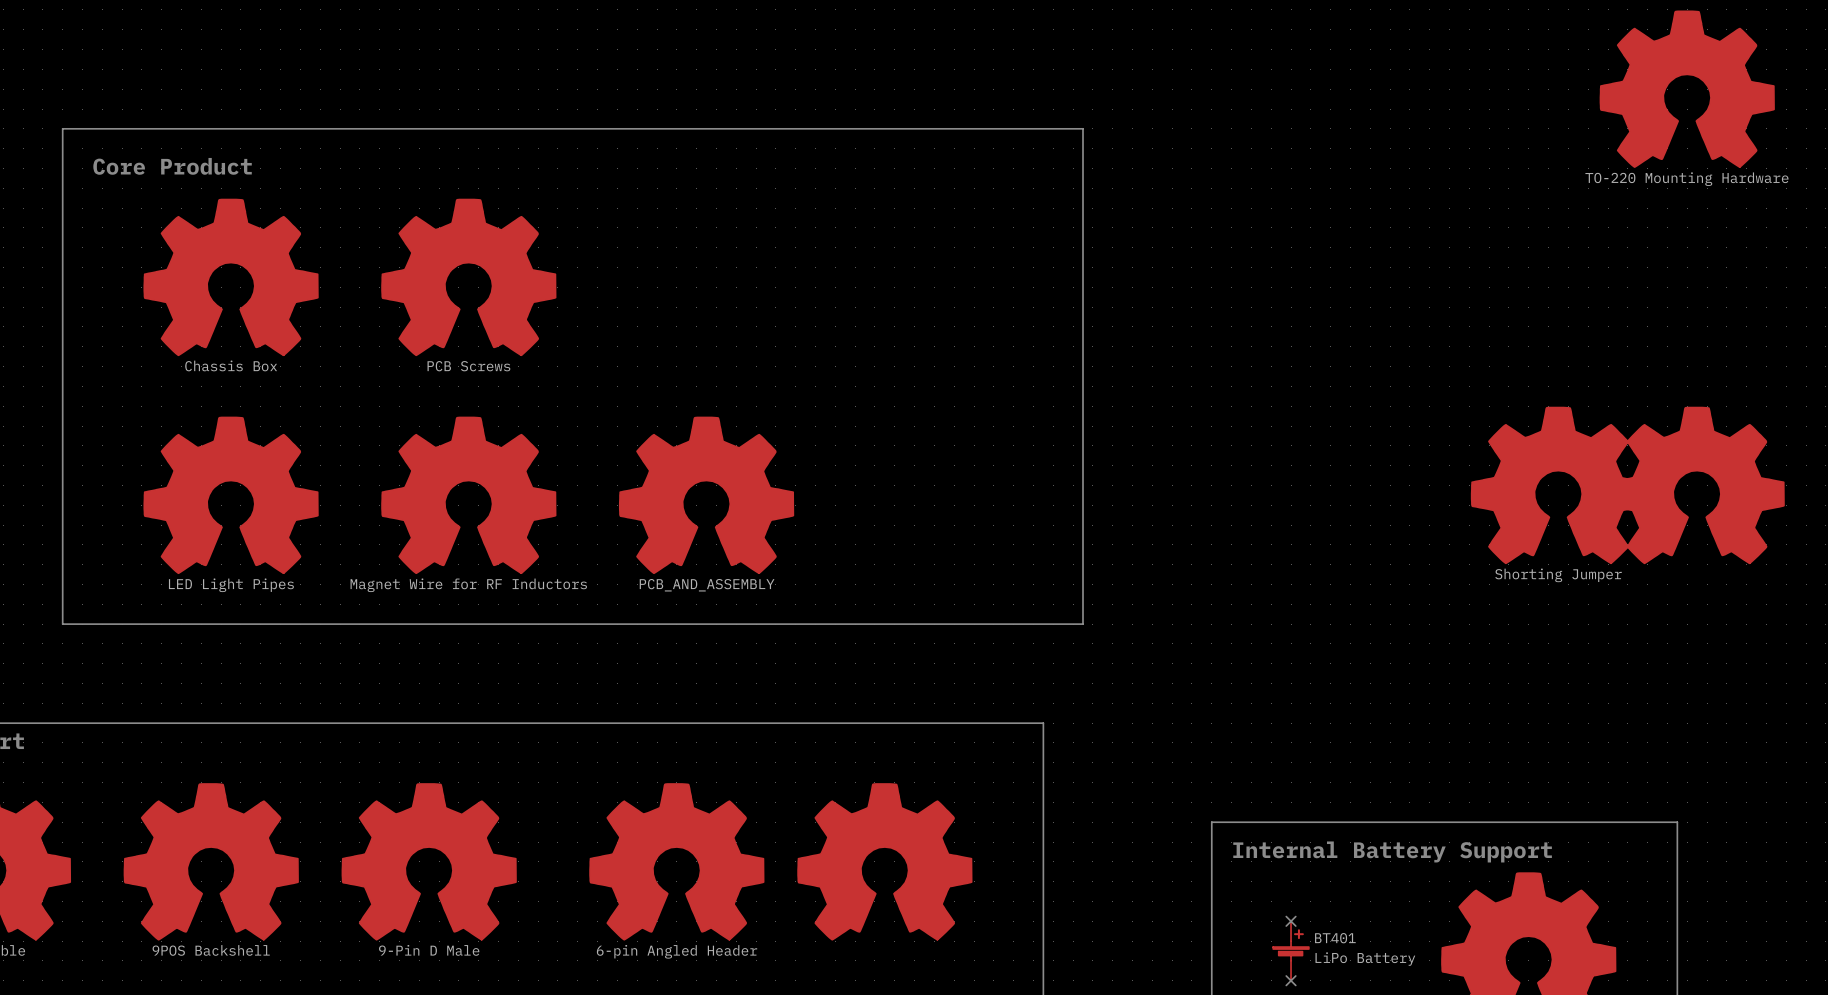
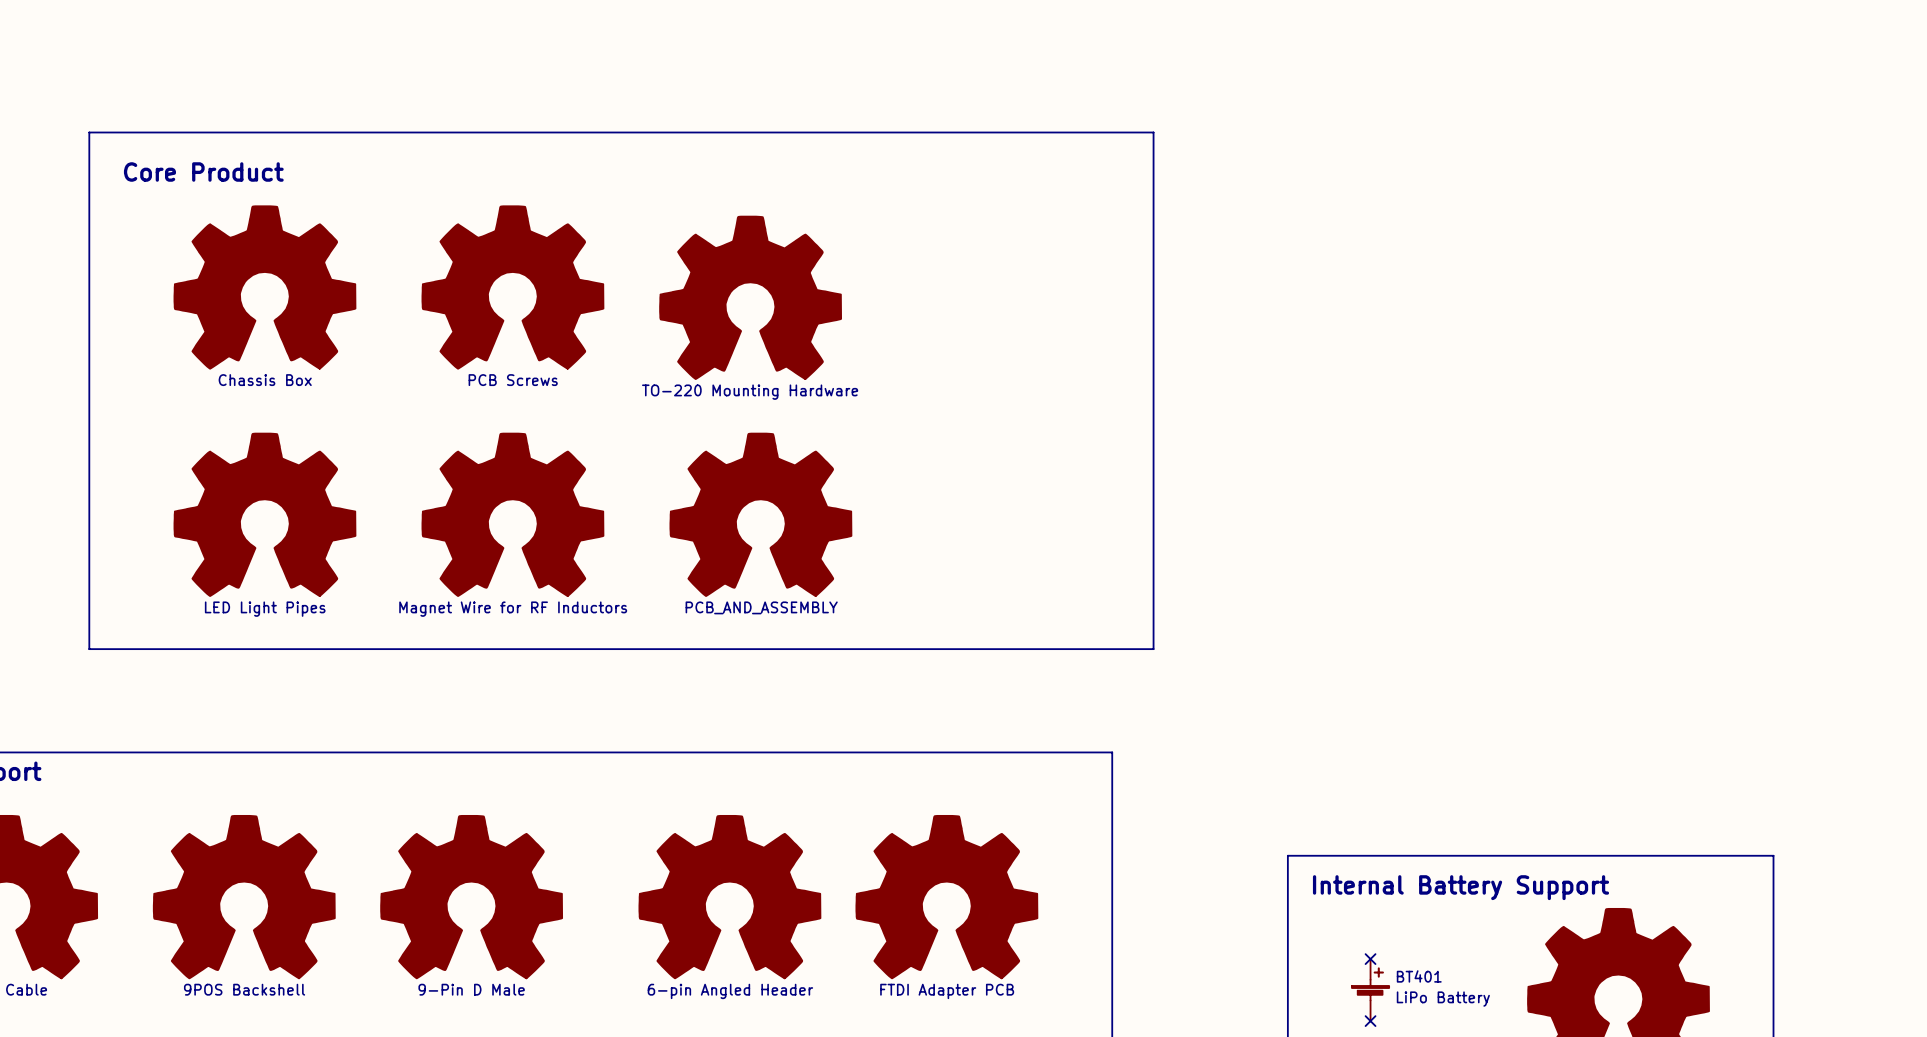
part: TO-220 Mounting Hardware (1687, 89) -> none
part: none -> TO-220 Mounting Hardware (750, 297)
part: Shorting Jumper (1558, 485) -> none
part: (1697, 485) -> none
part value: none -> FTDI Adapter PCB (947, 991)

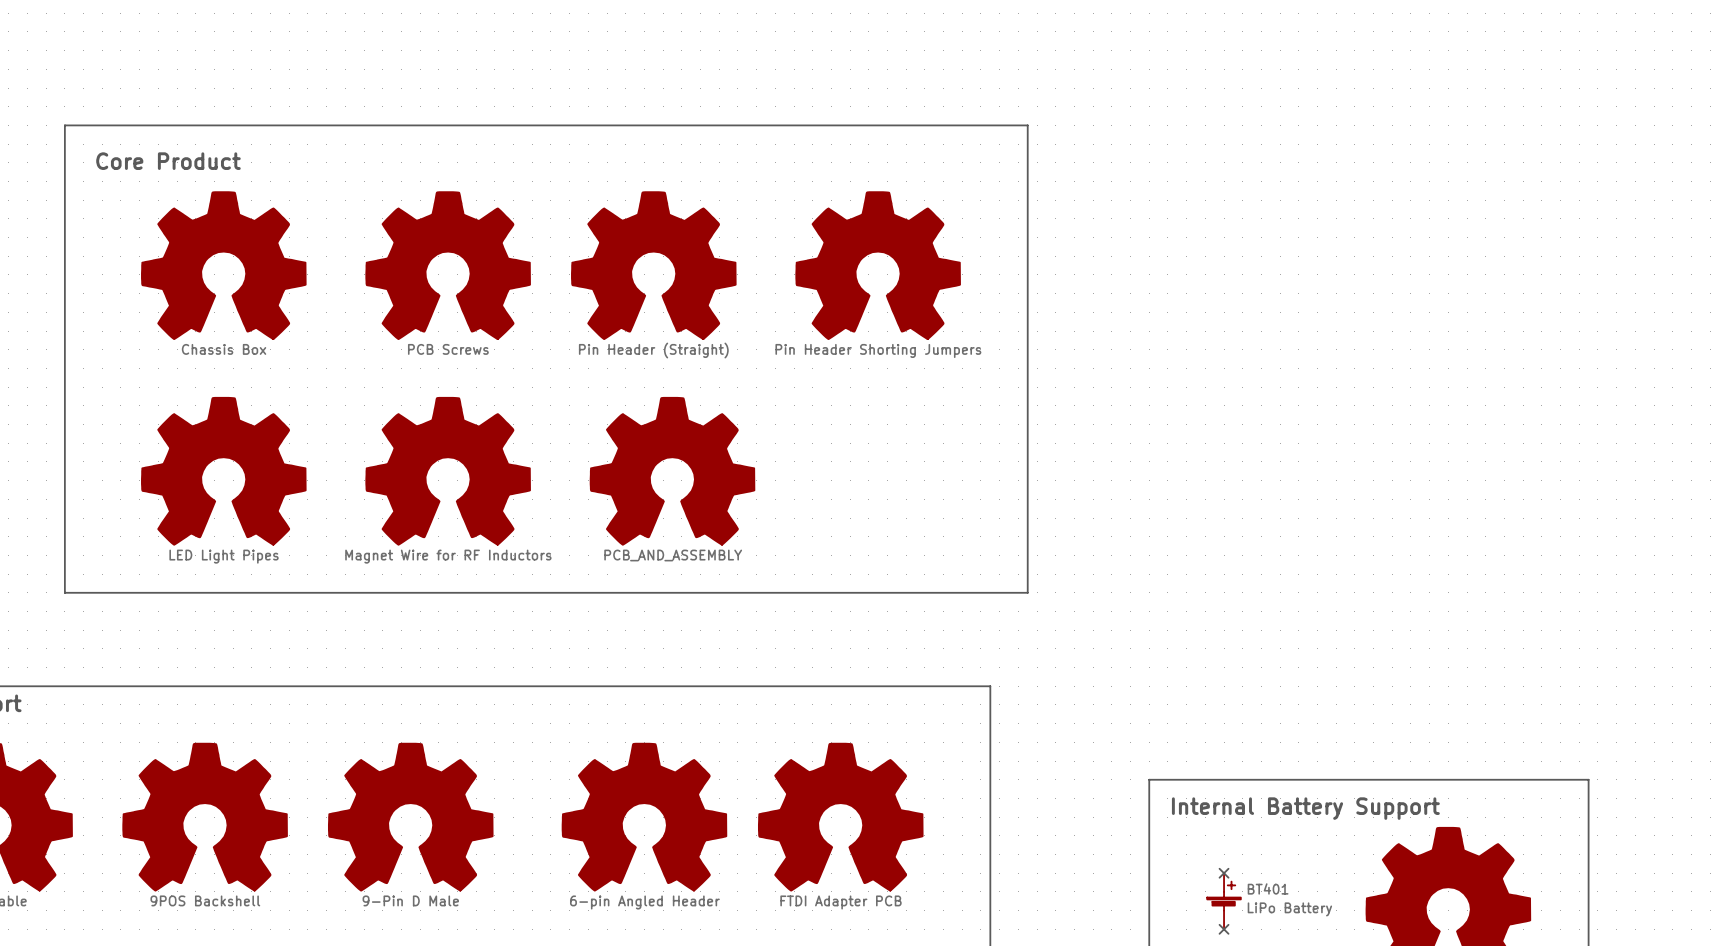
part: none -> Pin Header (Straight) (653, 265)
part: none -> Pin Header Shorting Jumpers (878, 265)
part: TO-220 Mounting Hardware (750, 297) -> none

